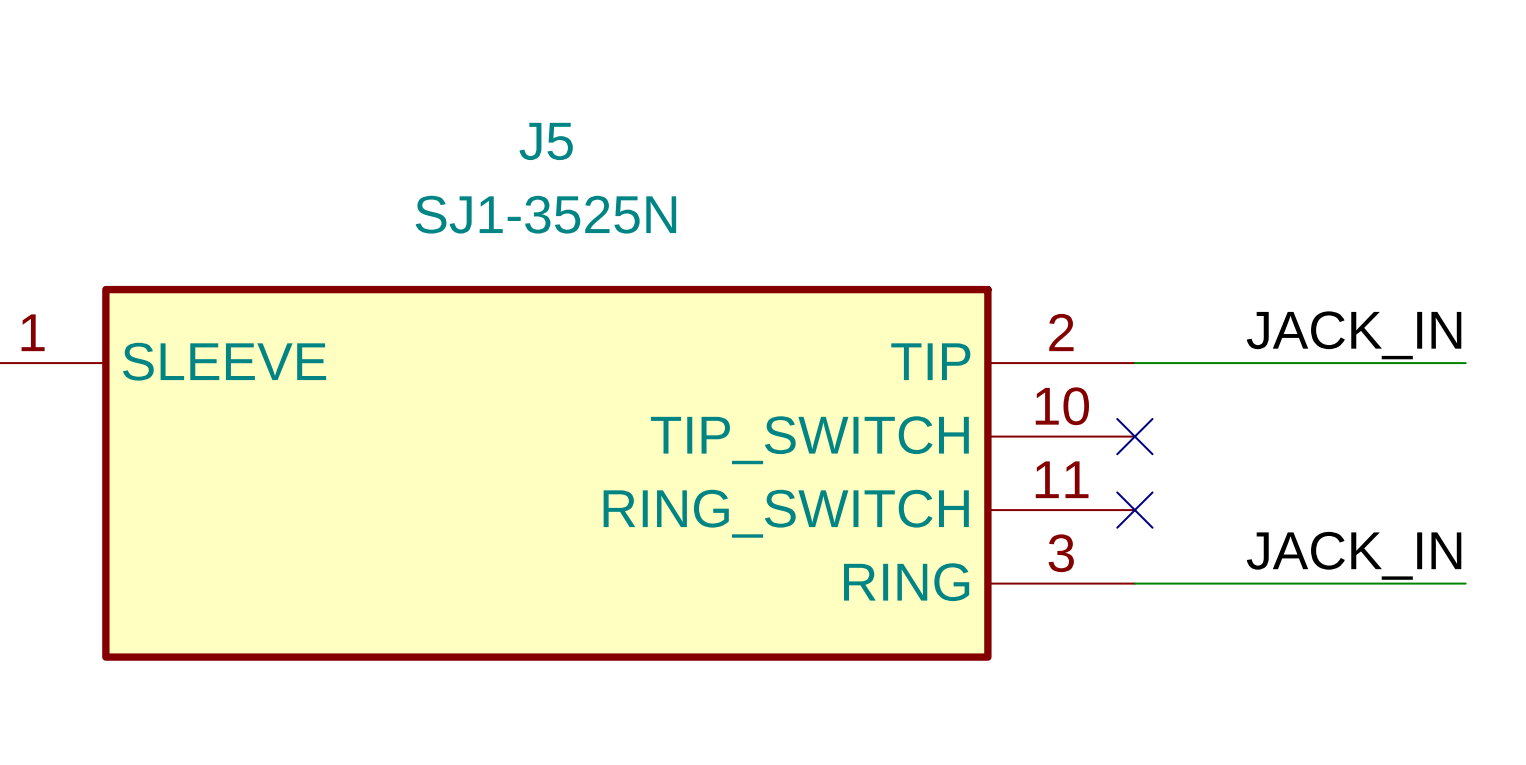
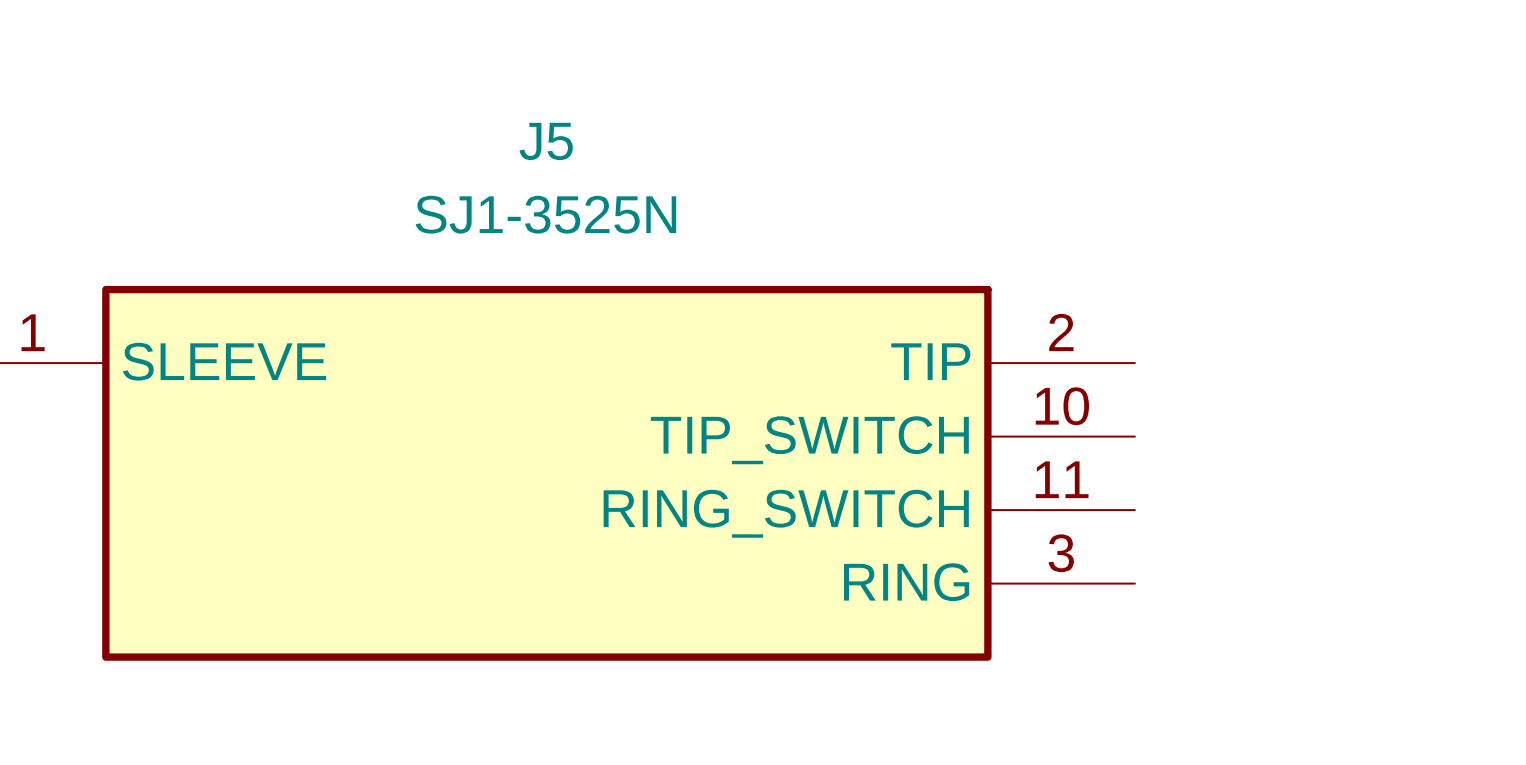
label: JACK_IN (1354, 335) -> none
wire: (1134, 363) (1465, 363) -> none
no-connect mark: (1134, 436) -> none
no-connect mark: (1134, 510) -> none
label: JACK_IN (1354, 555) -> none
wire: (1134, 583) (1465, 583) -> none

